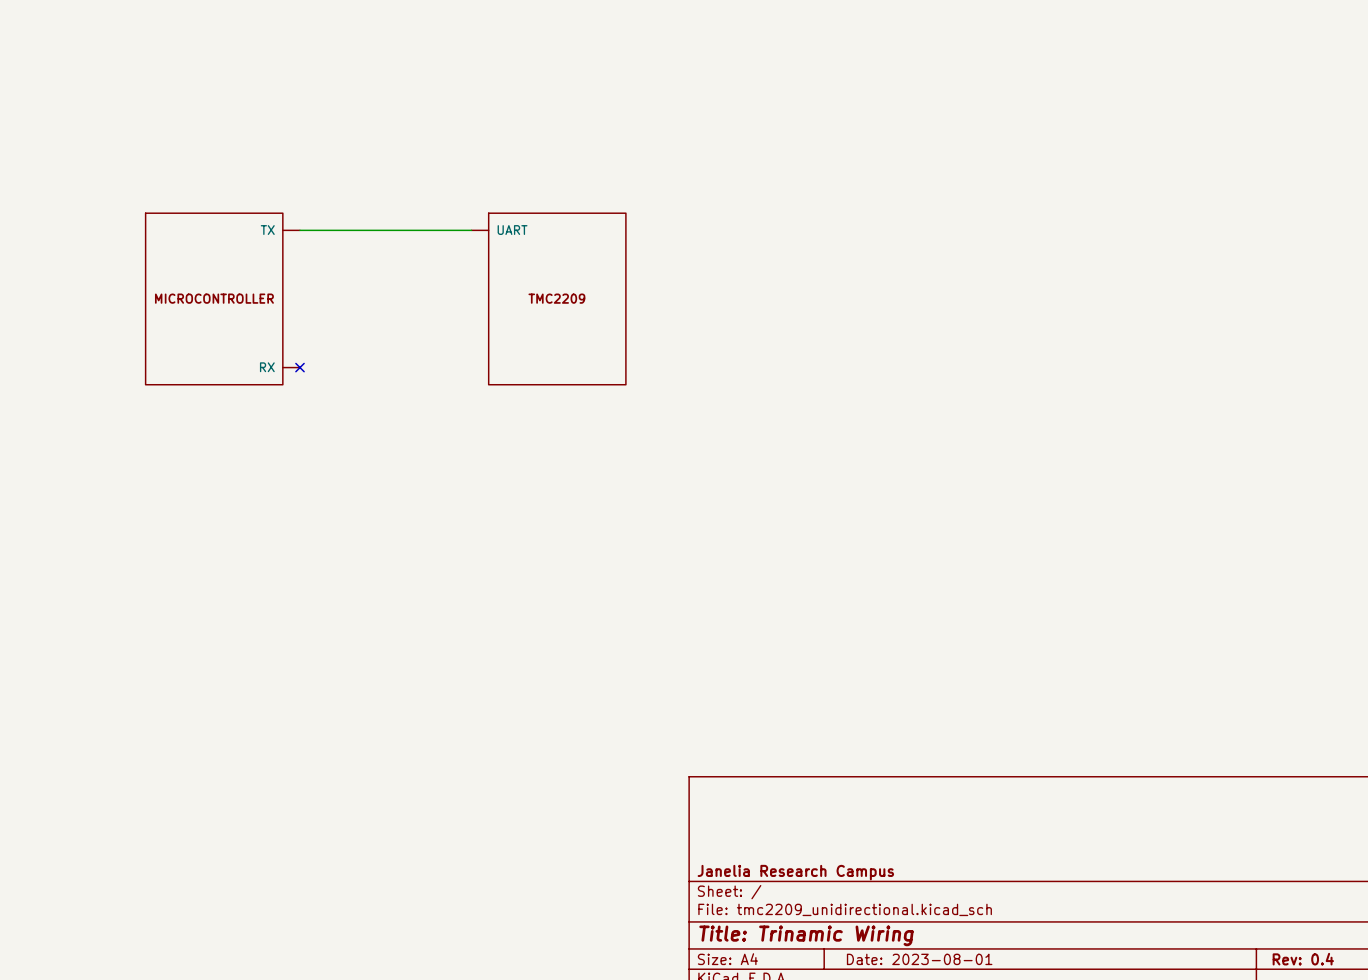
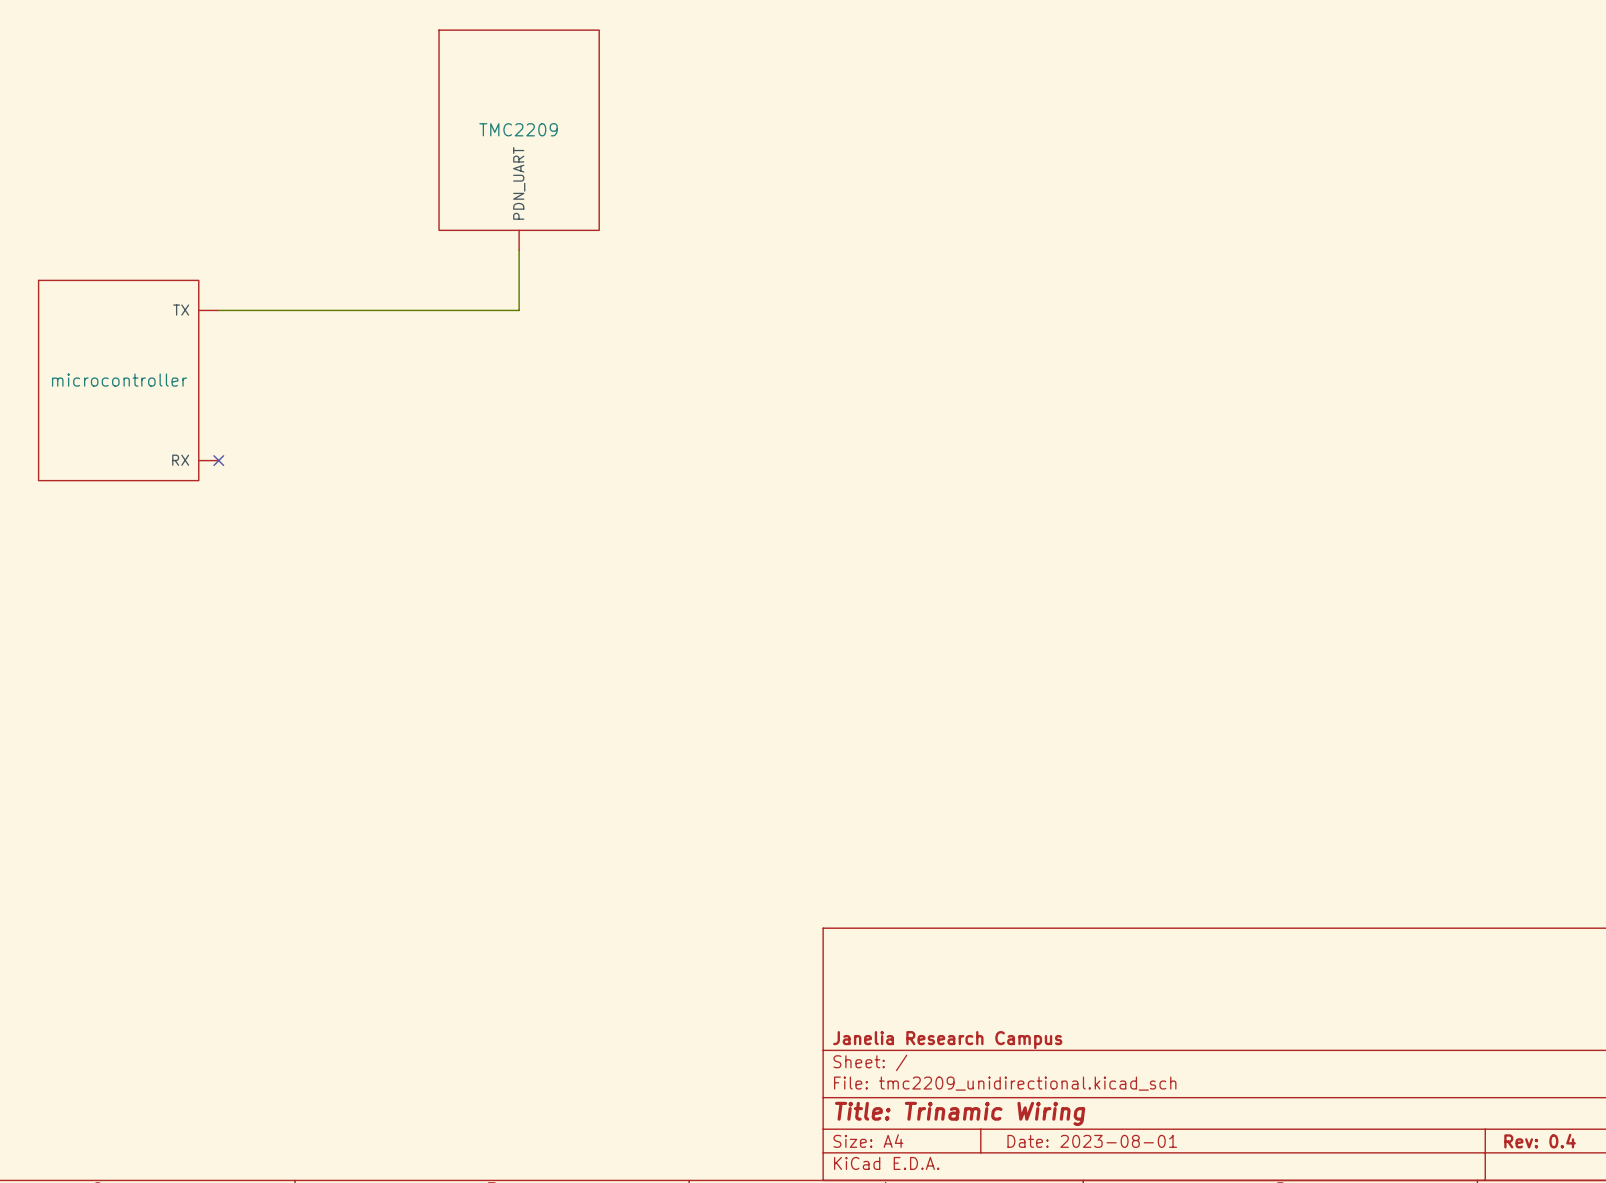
part: none -> TMC2209 (519, 140)
wire: none -> (519, 250) (519, 310) (218, 310)
wire: (300, 230) (471, 230) -> none
part: (222, 298) -> none
part: (548, 298) -> none
part: none -> microcontroller (128, 380)
no-connect mark: (300, 367) -> none
no-connect mark: none -> (218, 460)

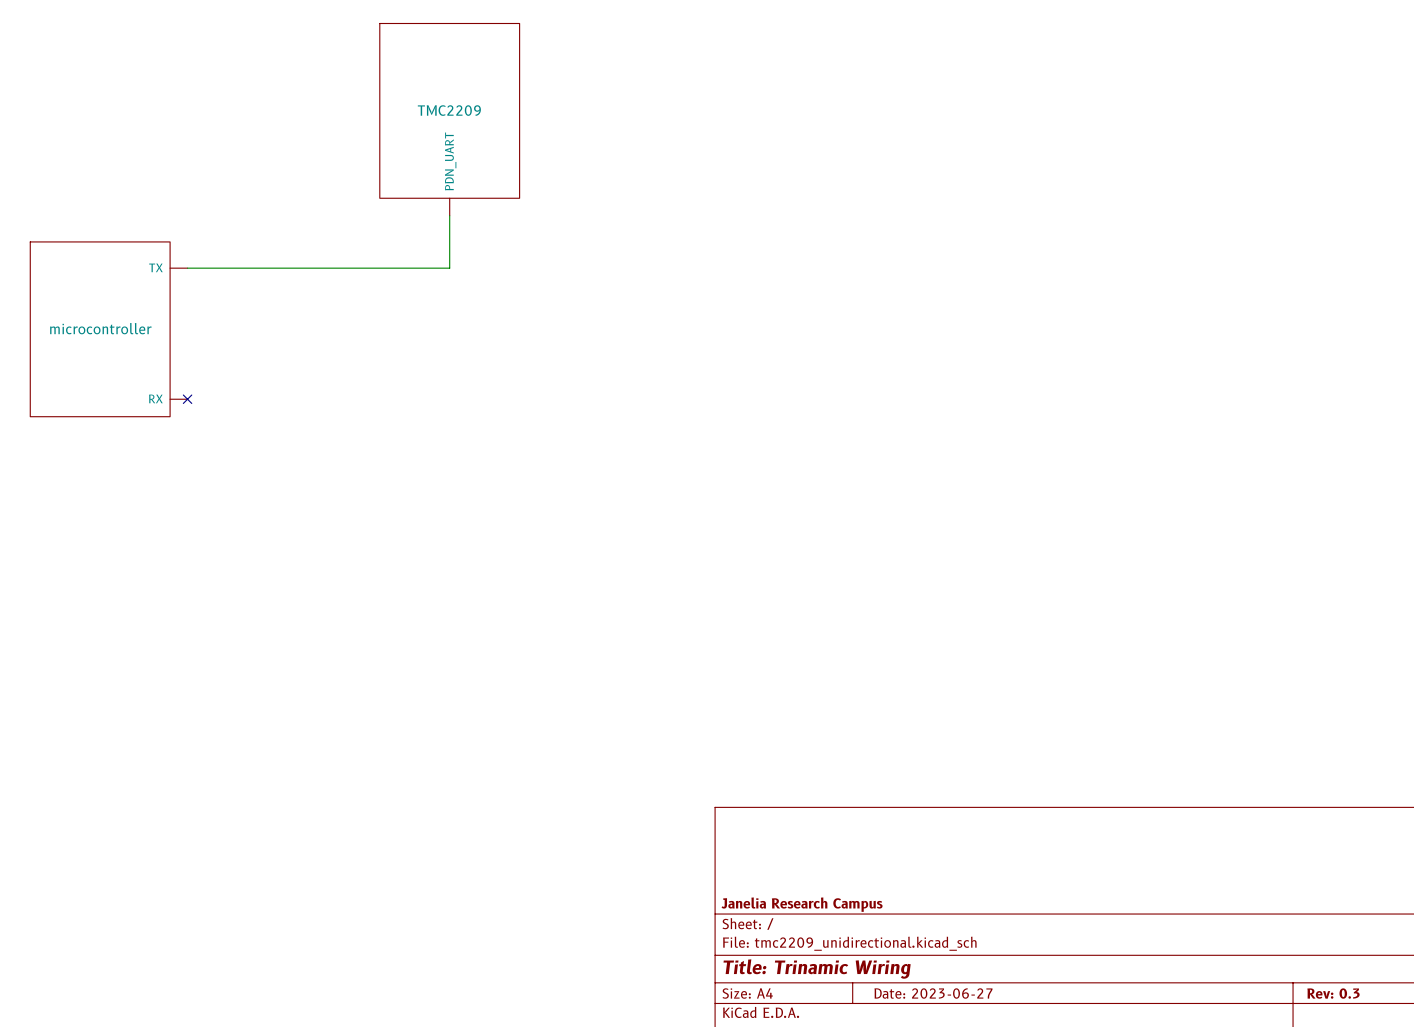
title block: Date: 2023-08-01 (1092, 1141) -> Date: 2023-06-27 (933, 993)
title block: Rev: 0.4 (1540, 1141) -> Rev: 0.3 (1333, 993)

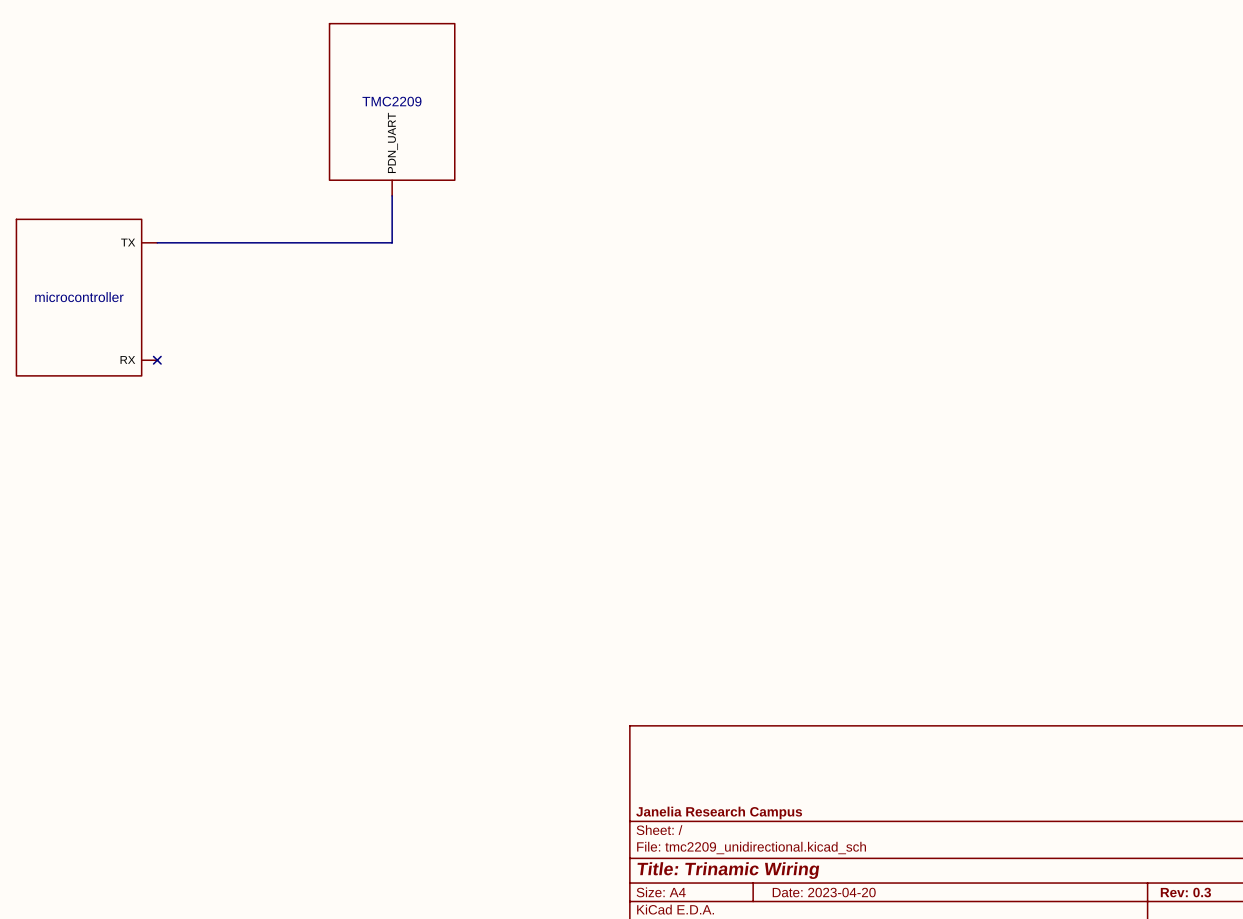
title block: Date: 2023-06-27 (933, 993) -> Date: 2023-04-20 (824, 892)

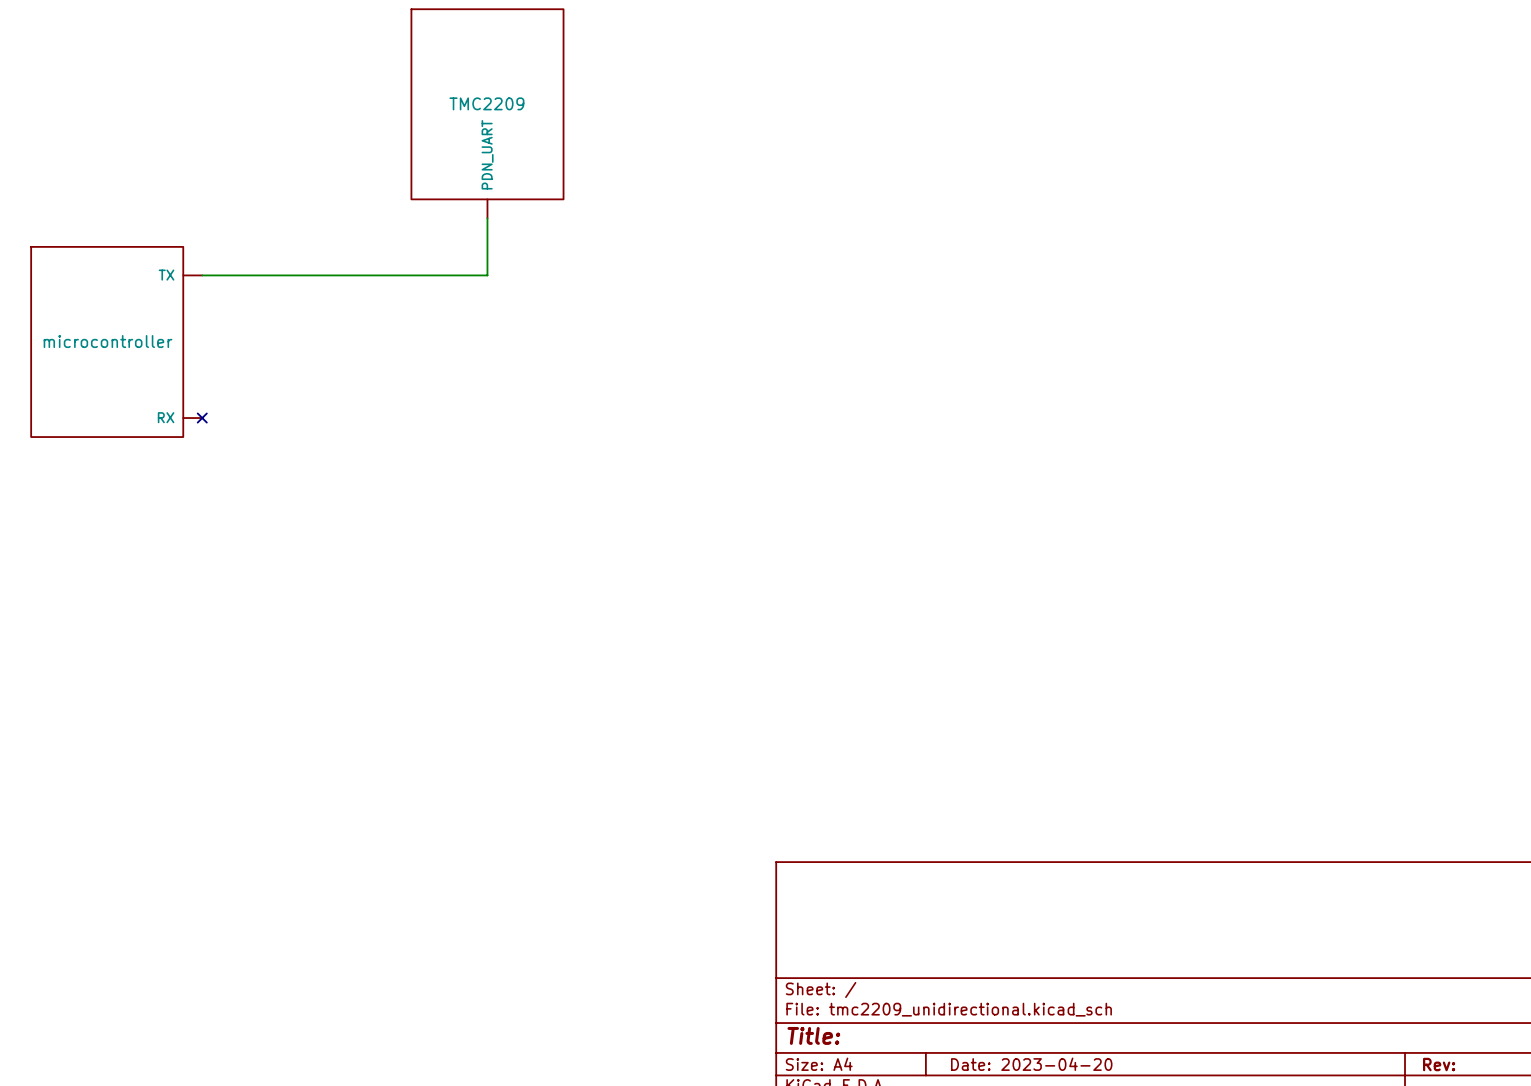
title block: Janelia Research Campus (719, 812) -> none
title block: Title: Trinamic Wiring (728, 870) -> Title: (813, 1035)
title block: Rev: 0.3 (1185, 892) -> Rev: (1439, 1064)

